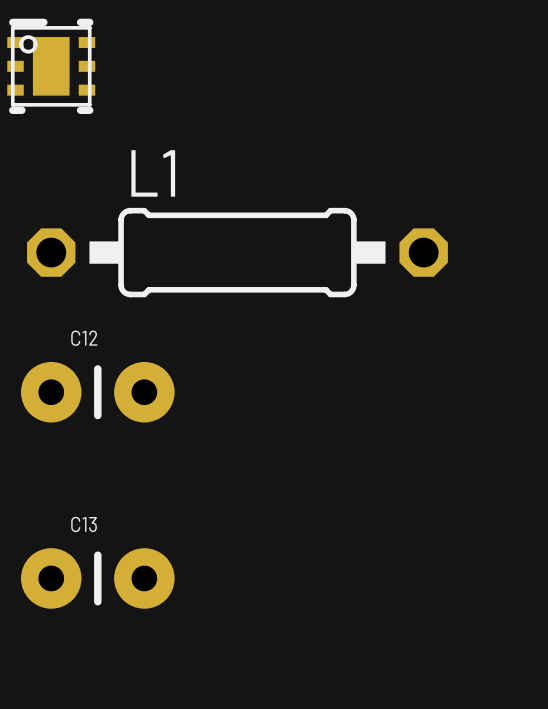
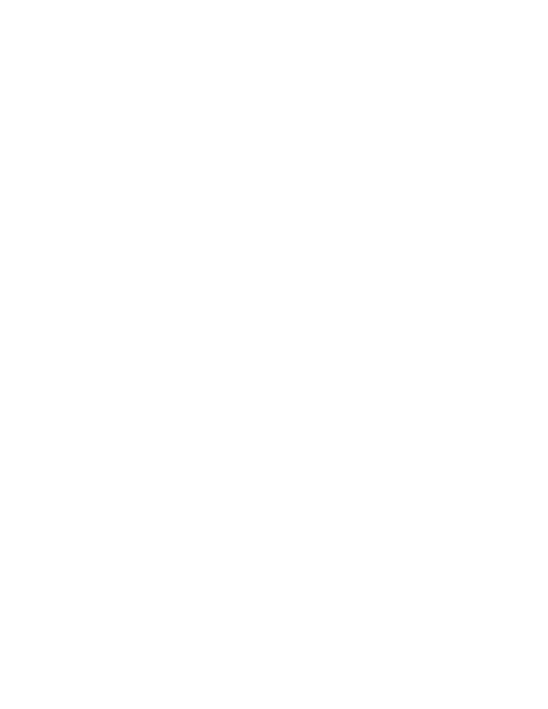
part: (51, 66) -> none
L1: (237, 252) -> none
C12: (97, 392) -> none
C13: (97, 578) -> none

